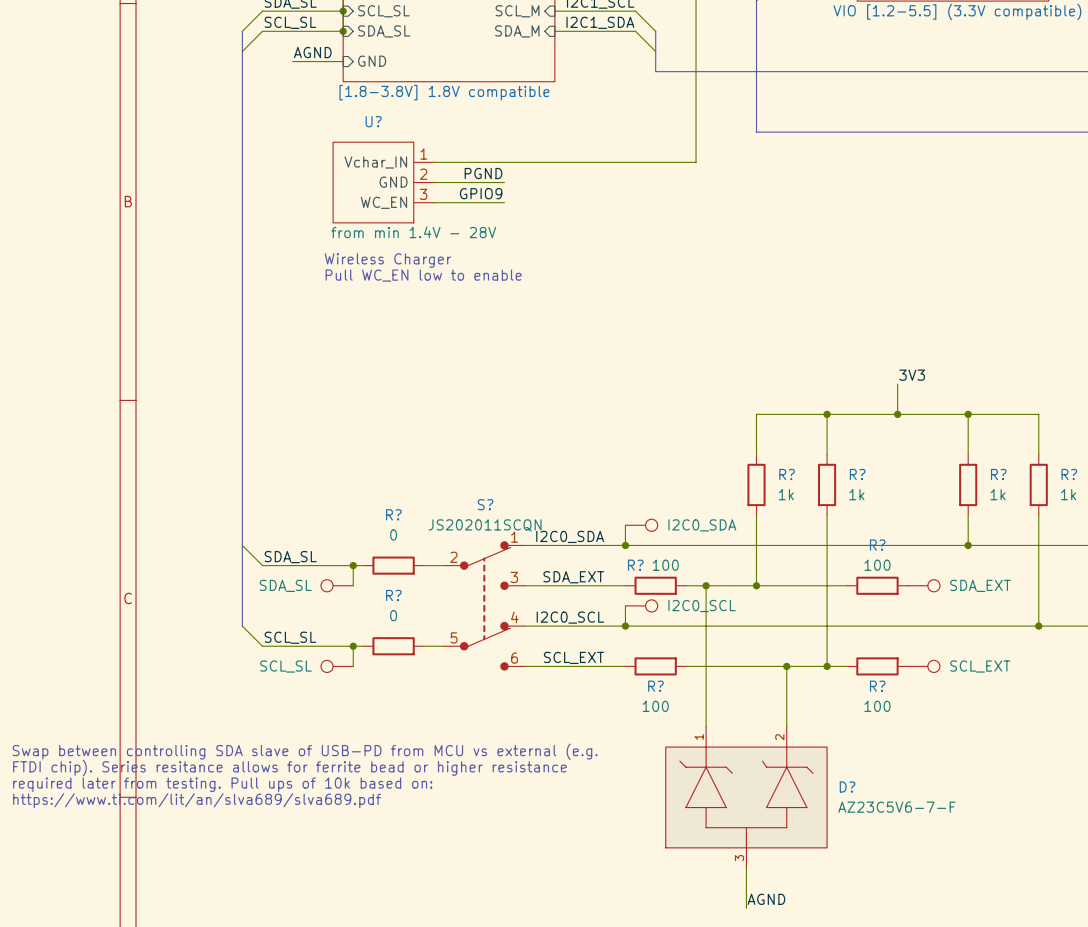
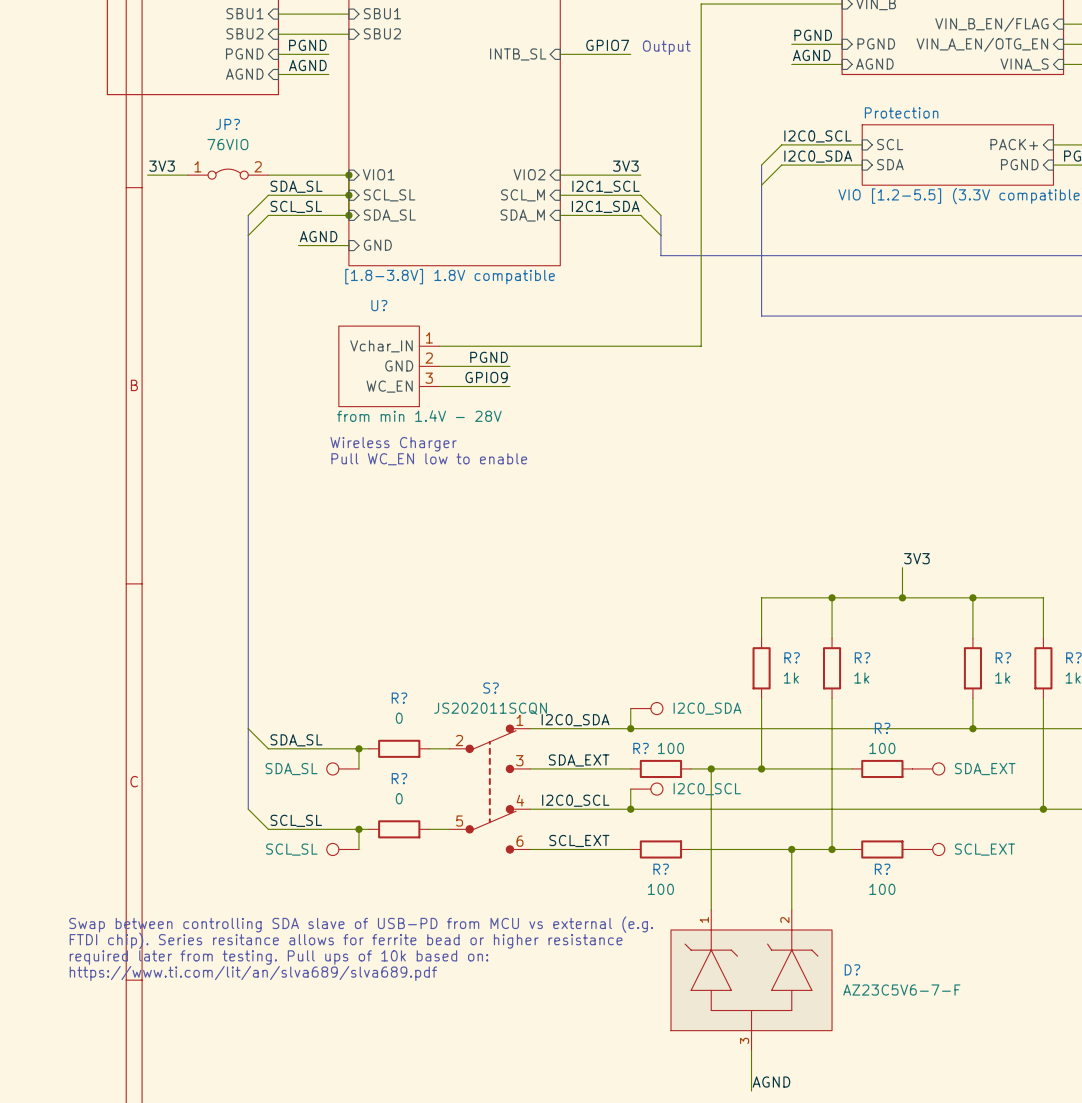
text position: Swap between controlling SDA slave of USB-PD from MCU vs external (e.g. (305, 751) -> Swap between controlling SDA slave of USB-PD from MCU vs external (e.g. (361, 924)
text position: FTDI chip). Series resitance allows for ferrite bead or higher resistance (289, 768) -> FTDI chip). Series resitance allows for ferrite bead or higher resistance (346, 940)
text position: required later from testing. Pull ups of 10k based on: (222, 784) -> required later from testing. Pull ups of 10k based on: (279, 957)
text position: https://www.ti.com/lit/an/slva689/slva689.pdf (197, 800) -> https://www.ti.com/lit/an/slva689/slva689.pdf (253, 973)

